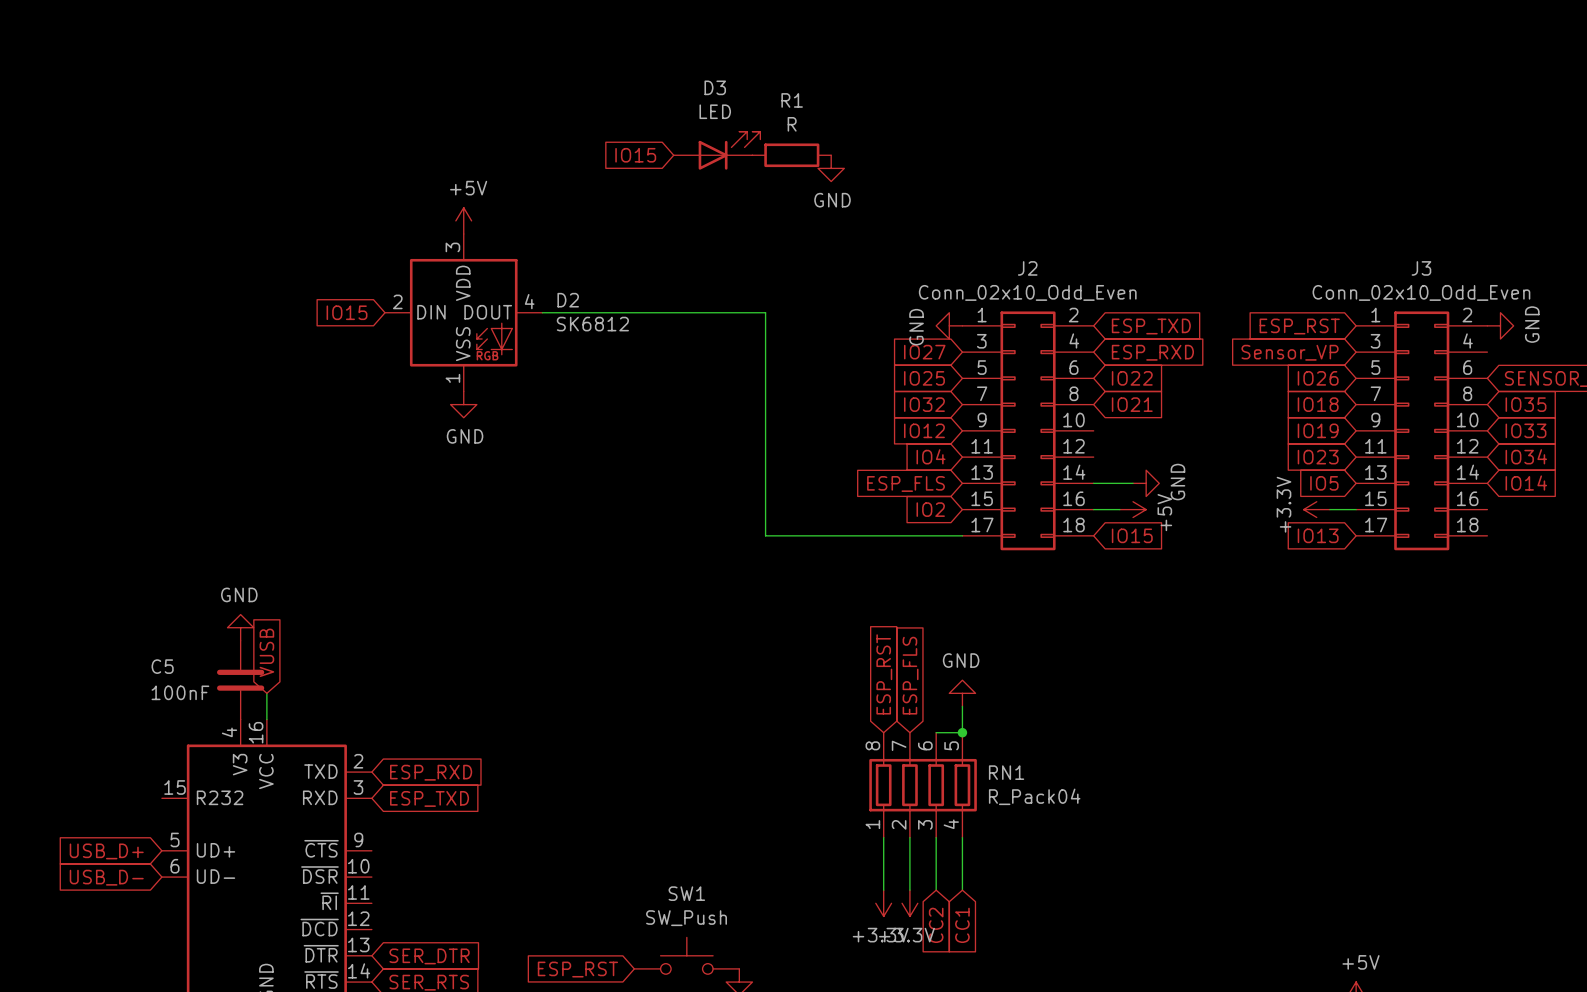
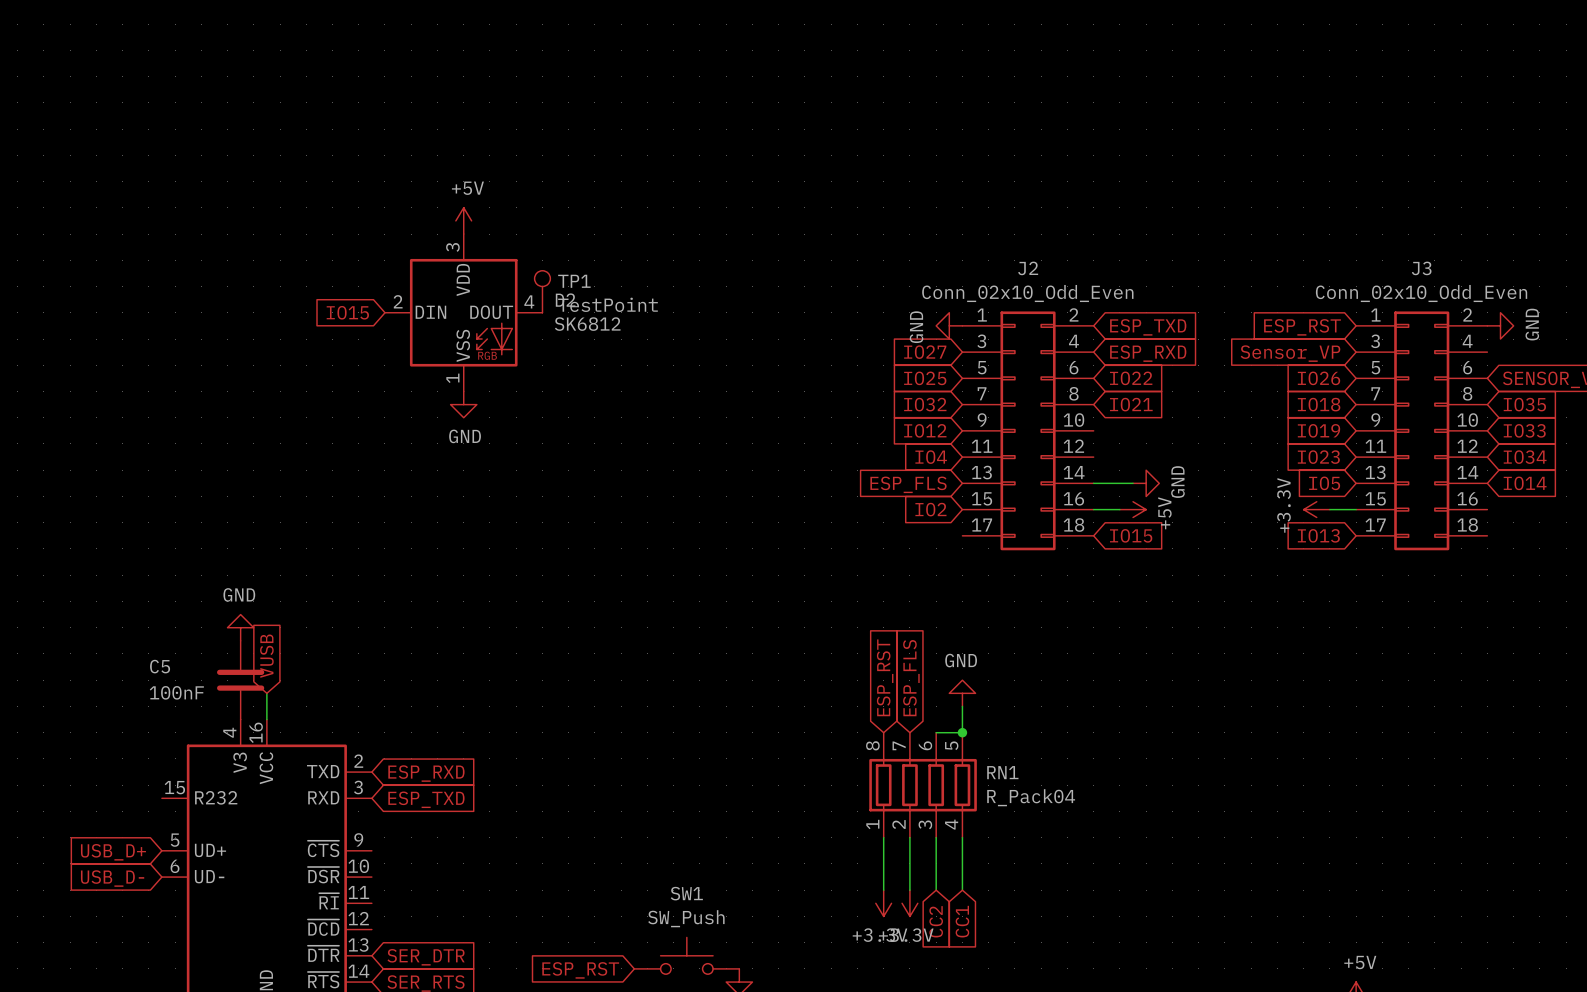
D3: LED (717, 150) -> none
global label: IO15 (635, 155) -> none
R1: R (791, 155) -> none
power symbol: GND (831, 168) -> none
TP1: none -> TestPoint (542, 291)
wire: (542, 312) (765, 312) (765, 535) (962, 535) -> none

